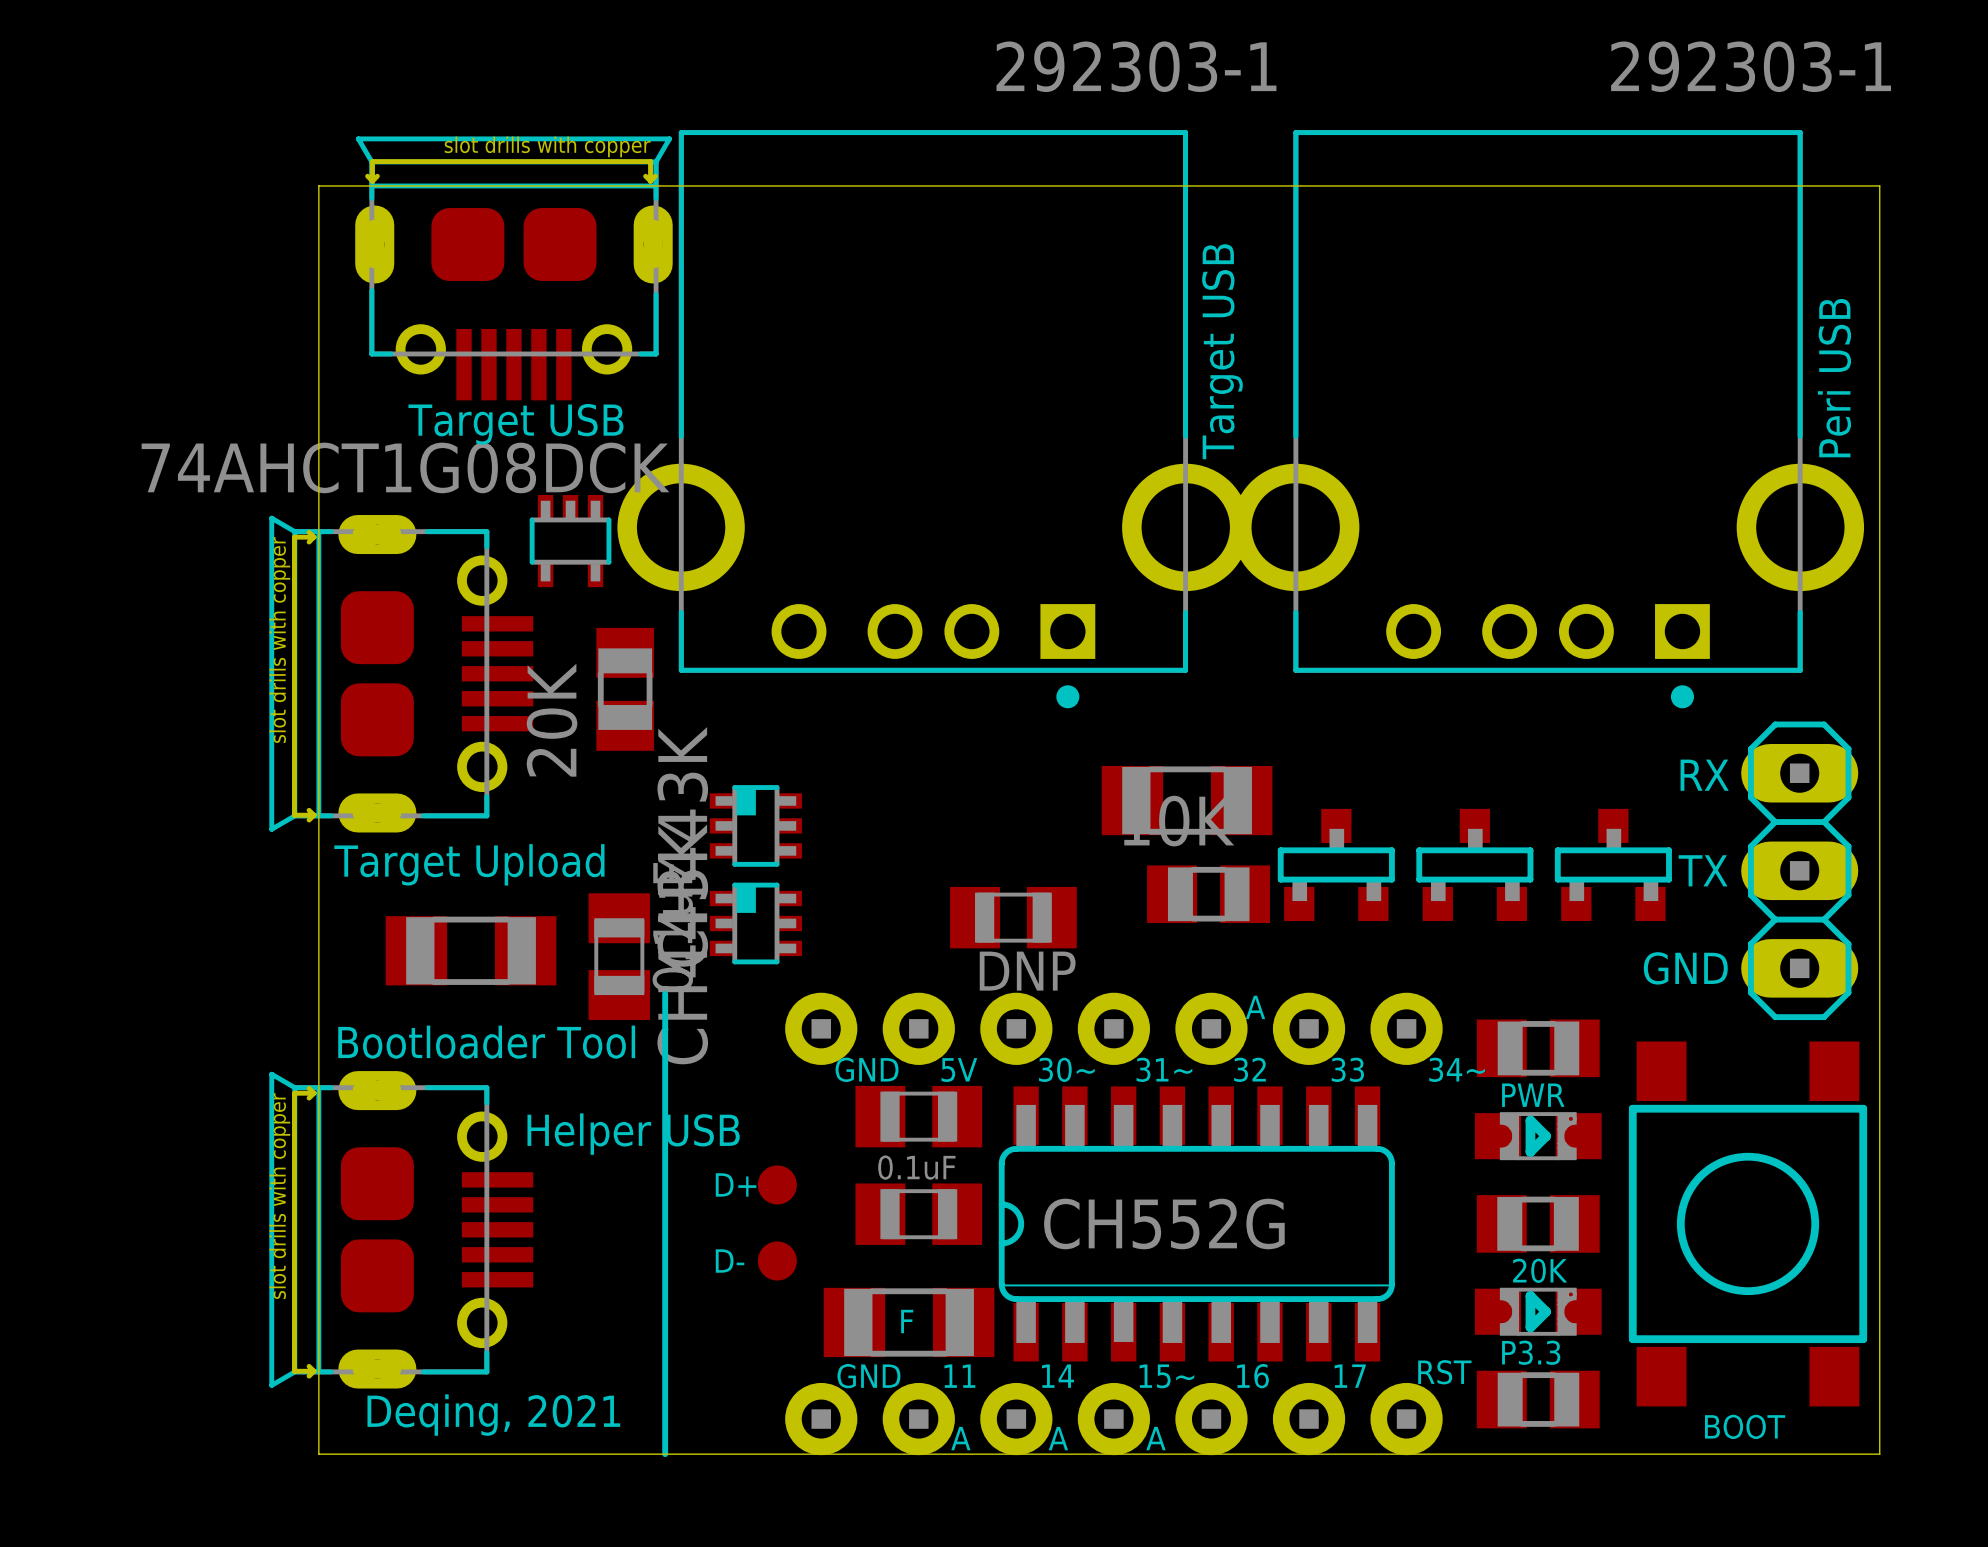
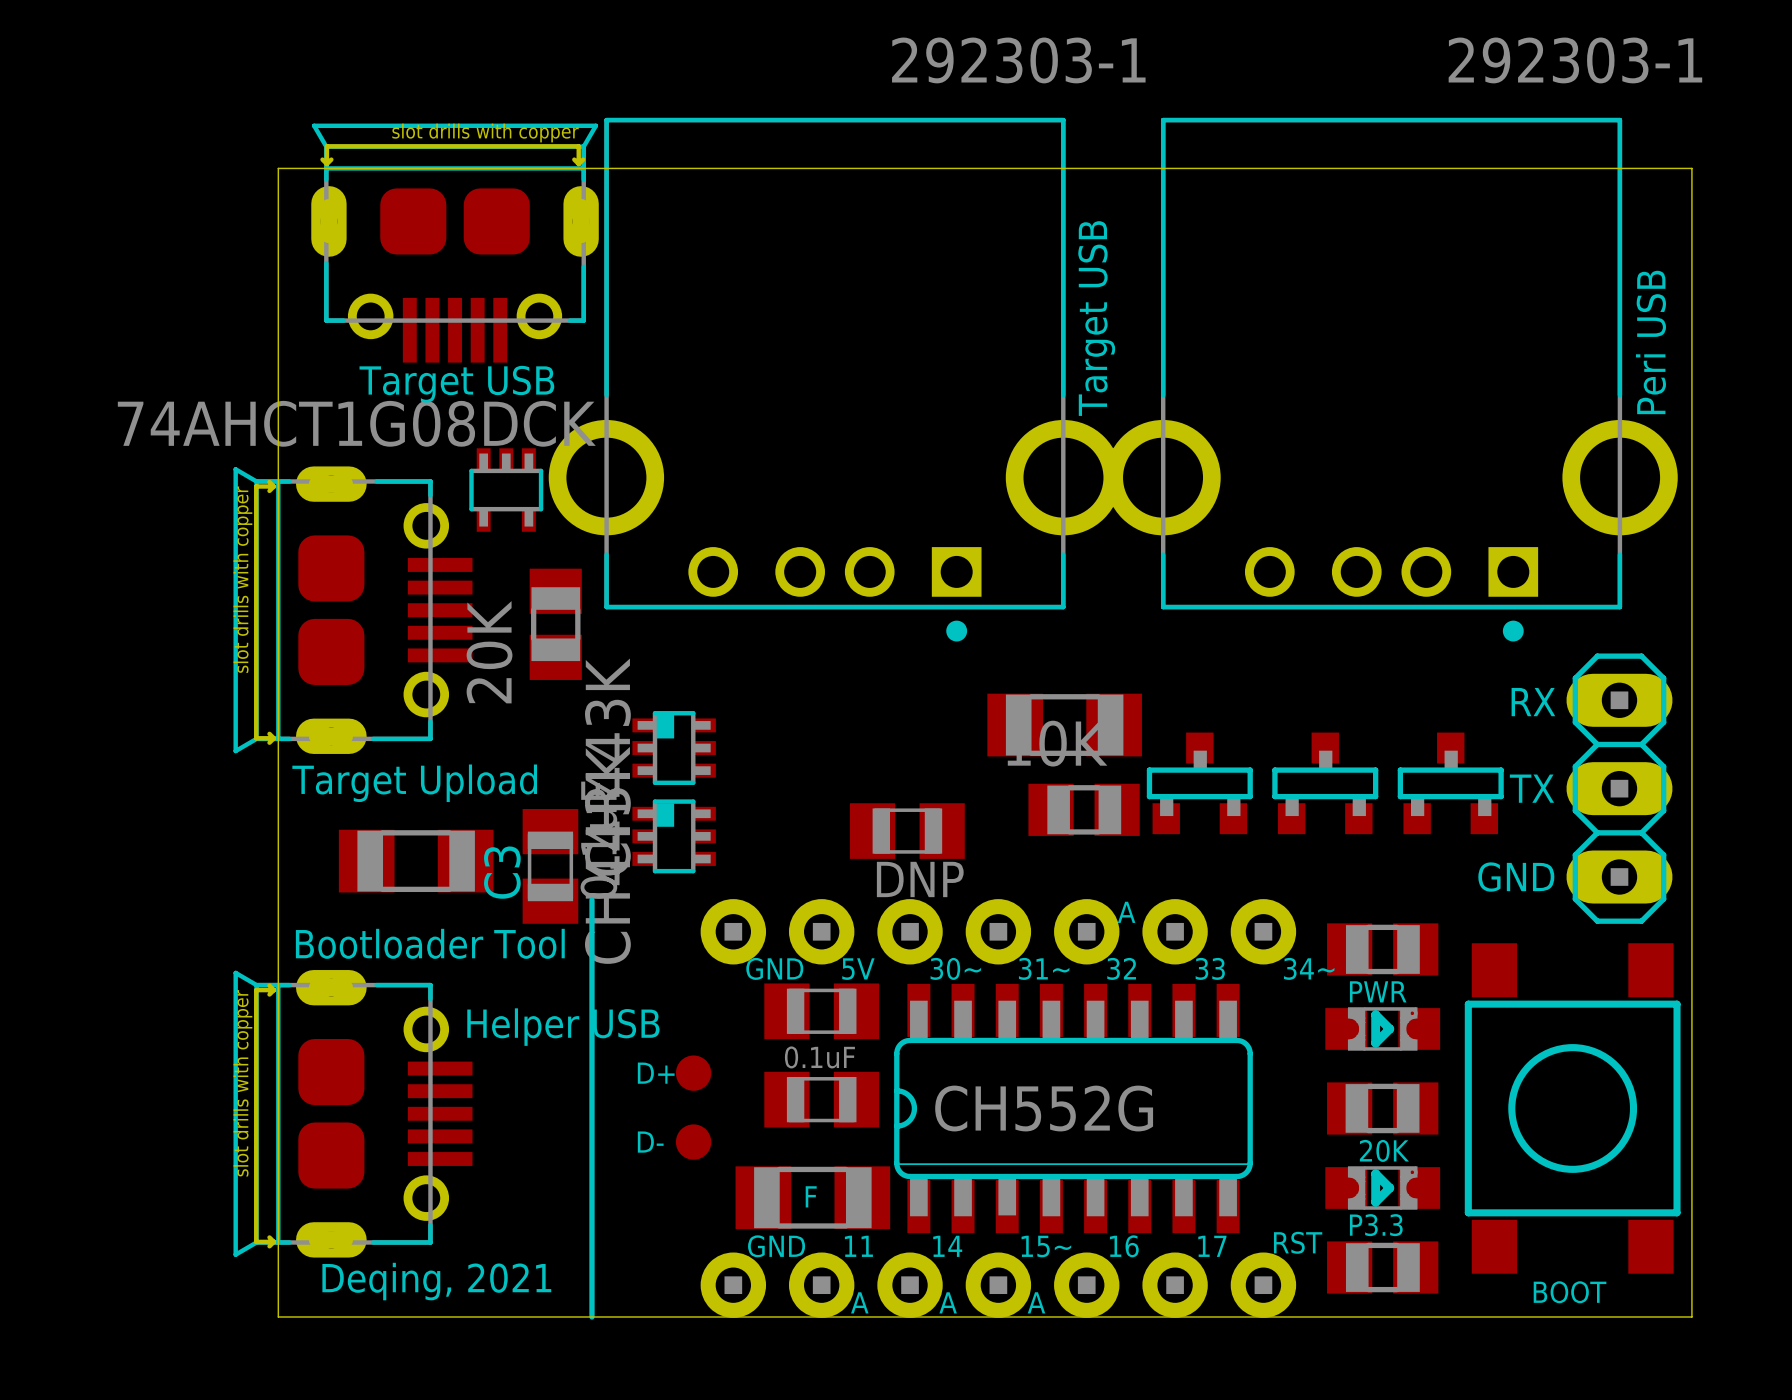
C3 name: none -> C3 (502, 872)

